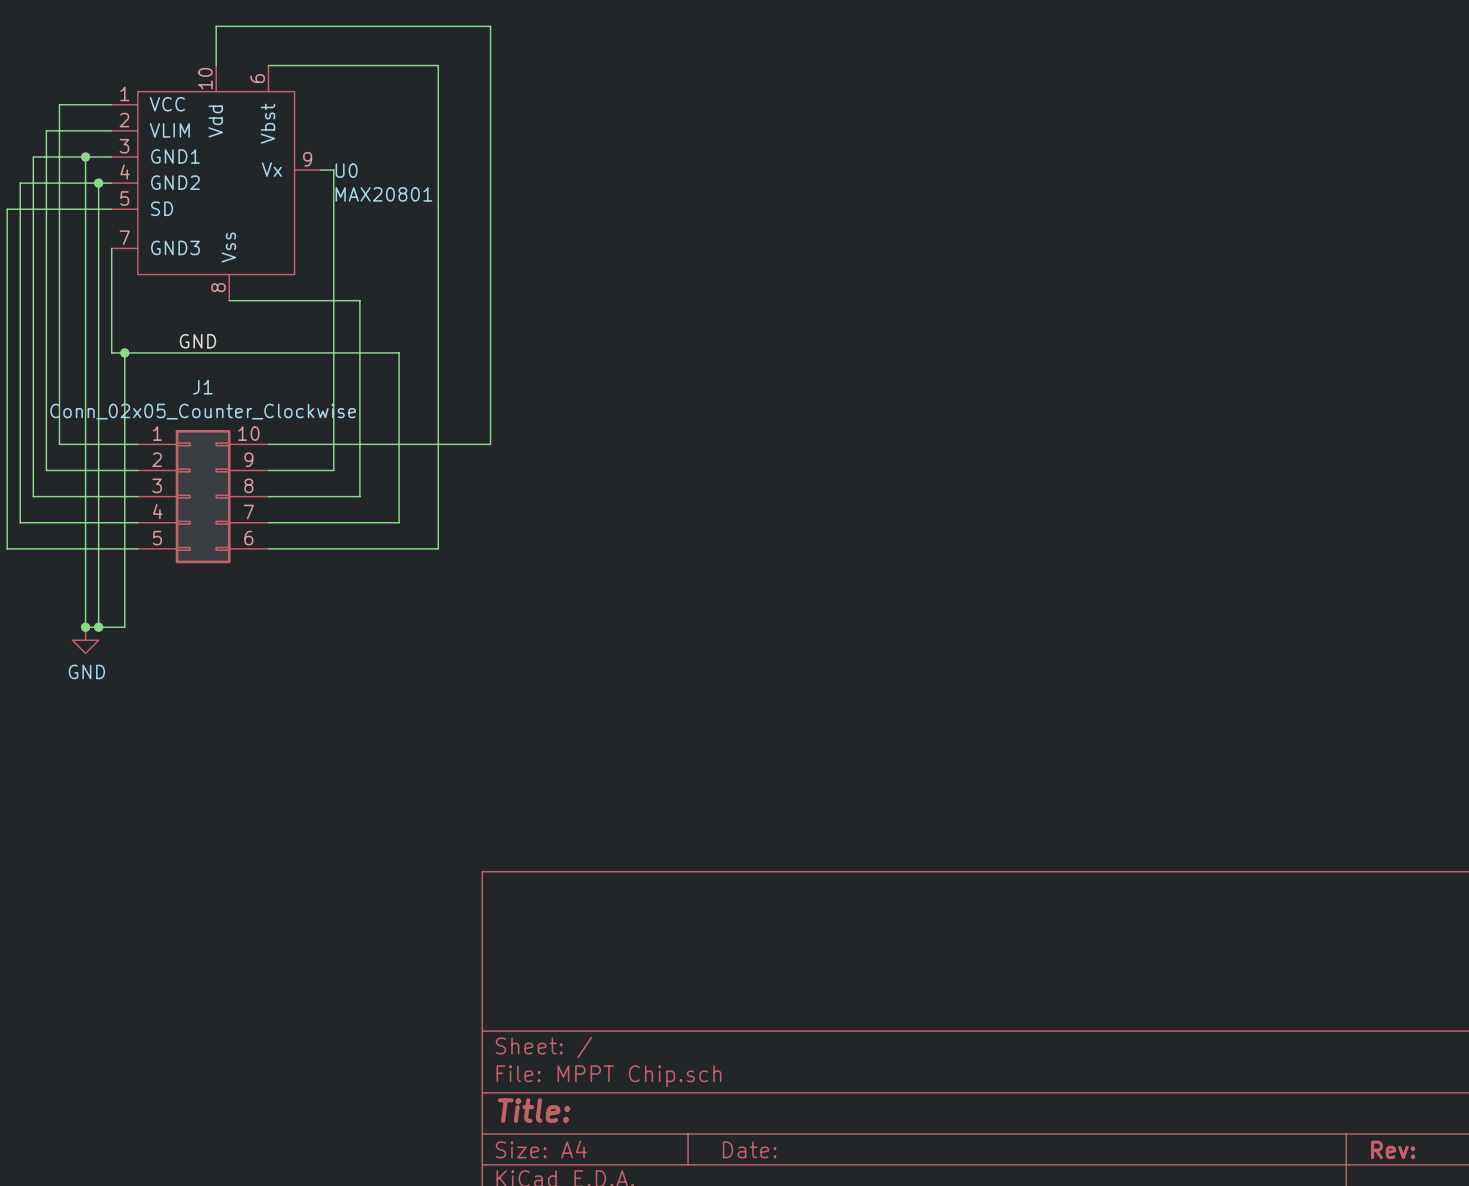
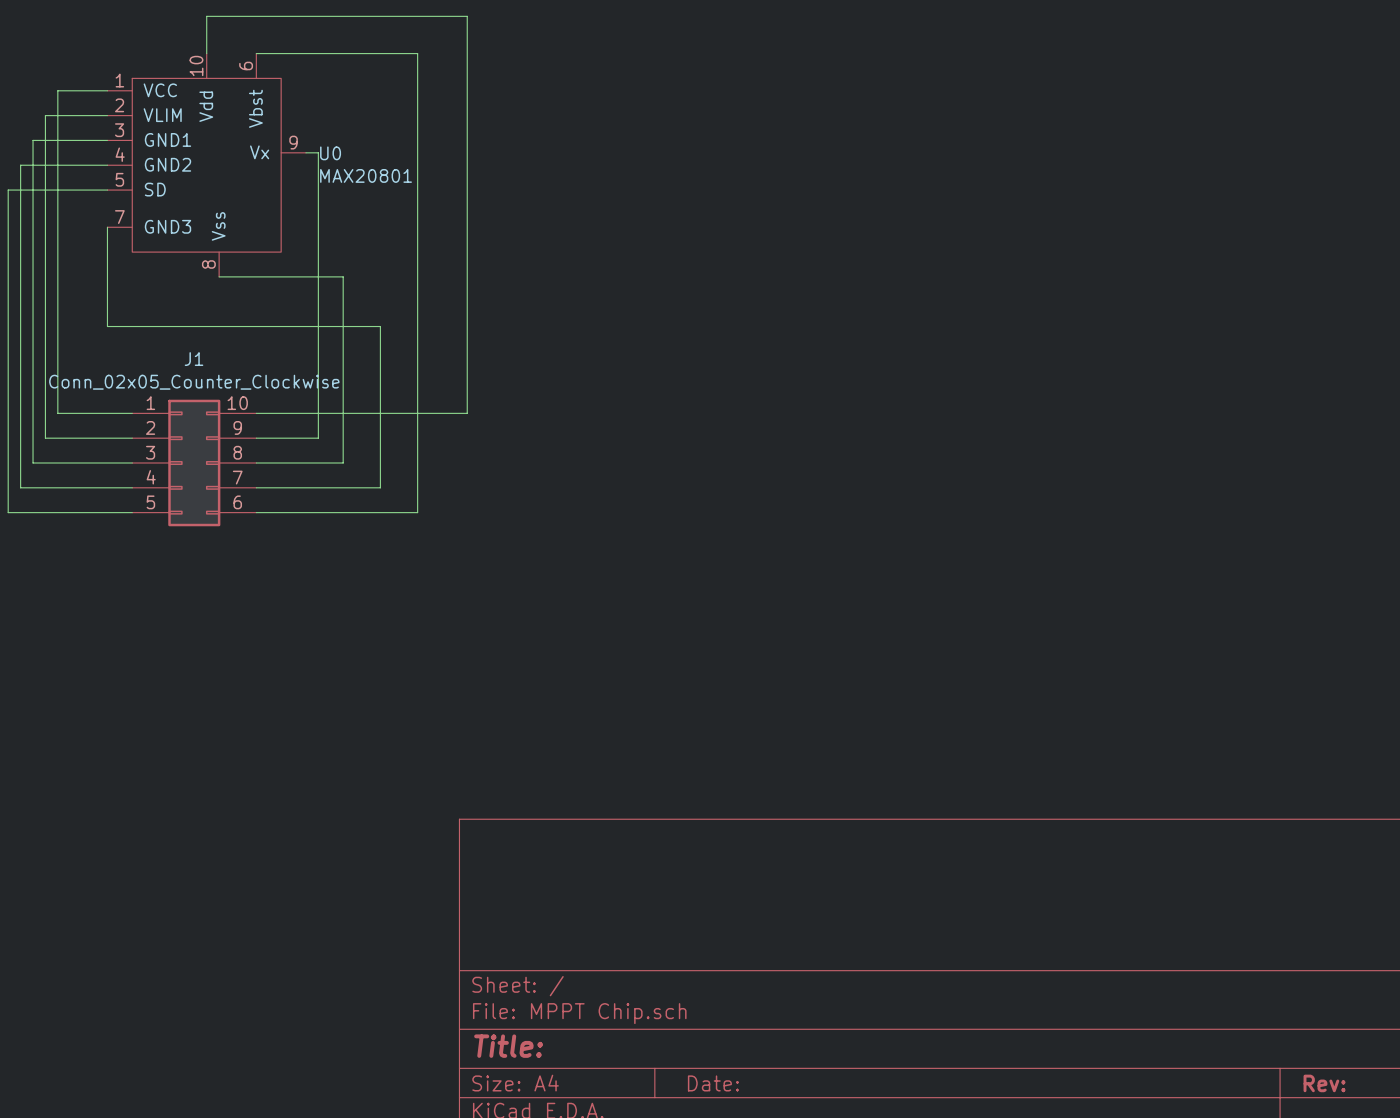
wire: (85, 156) (85, 627) (124, 627) (124, 352) -> none
junction: (85, 156) -> none
wire: (98, 183) (98, 627) -> none
junction: (98, 183) -> none
label: GND (197, 341) -> none
junction: (124, 352) -> none
junction: (85, 627) -> none
junction: (98, 627) -> none
power symbol: GND (85, 640) -> none

